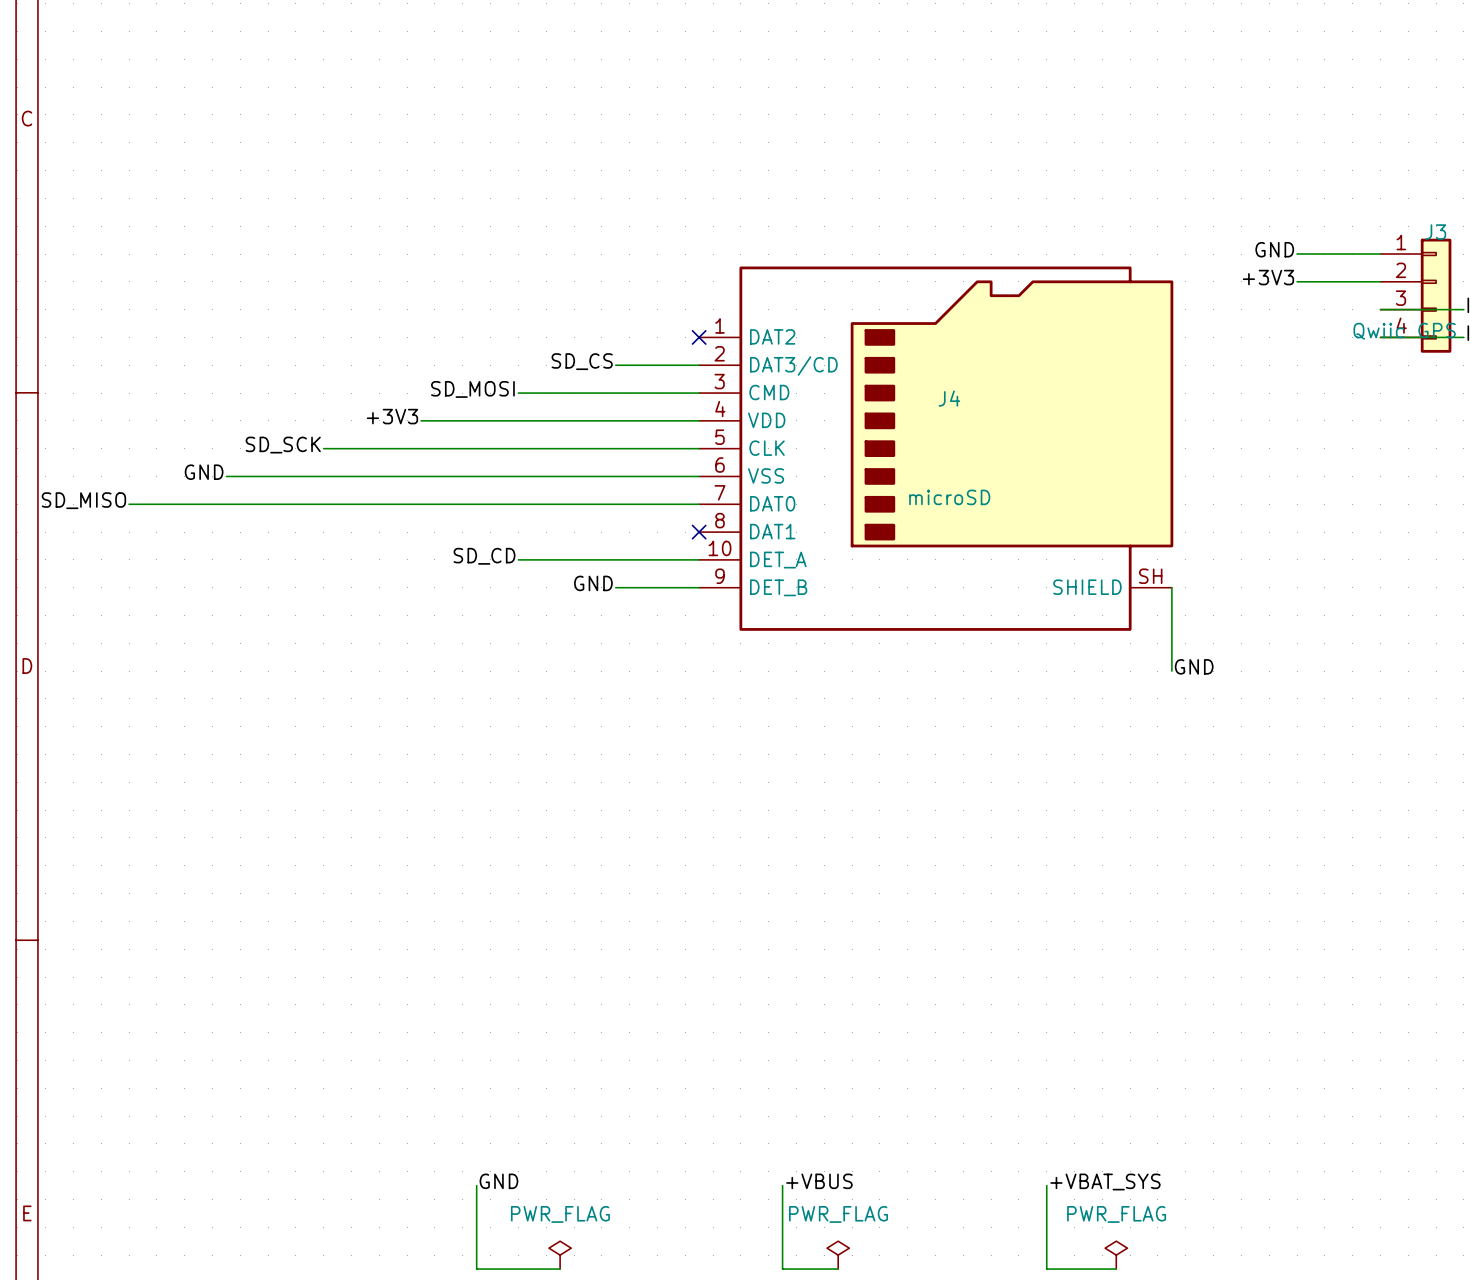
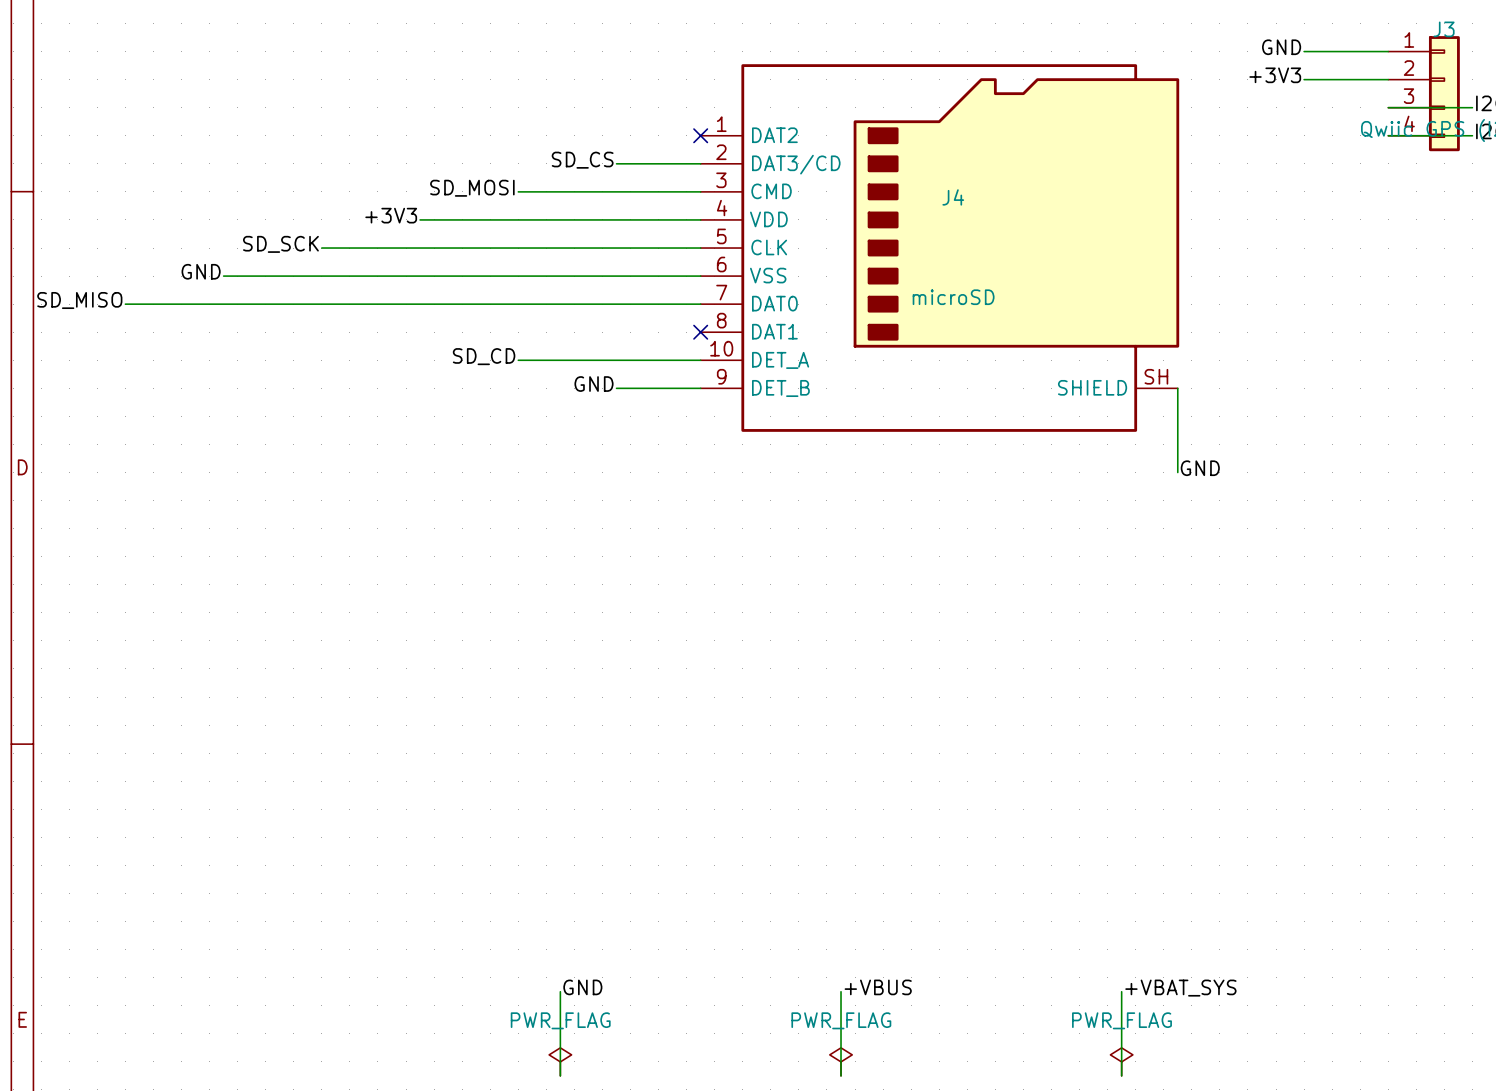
label position: GND (498, 1181) -> GND (582, 987)
label position: +VBUS (819, 1181) -> +VBUS (878, 987)
label position: +VBAT_SYS (1105, 1181) -> +VBAT_SYS (1180, 988)
wire: (476, 1185) (476, 1269) (560, 1269) -> (560, 991) (560, 1075)
wire: (782, 1185) (782, 1269) (838, 1269) -> (841, 991) (841, 1075)
wire: (1046, 1185) (1046, 1269) (1116, 1269) -> (1121, 991) (1121, 1075)

